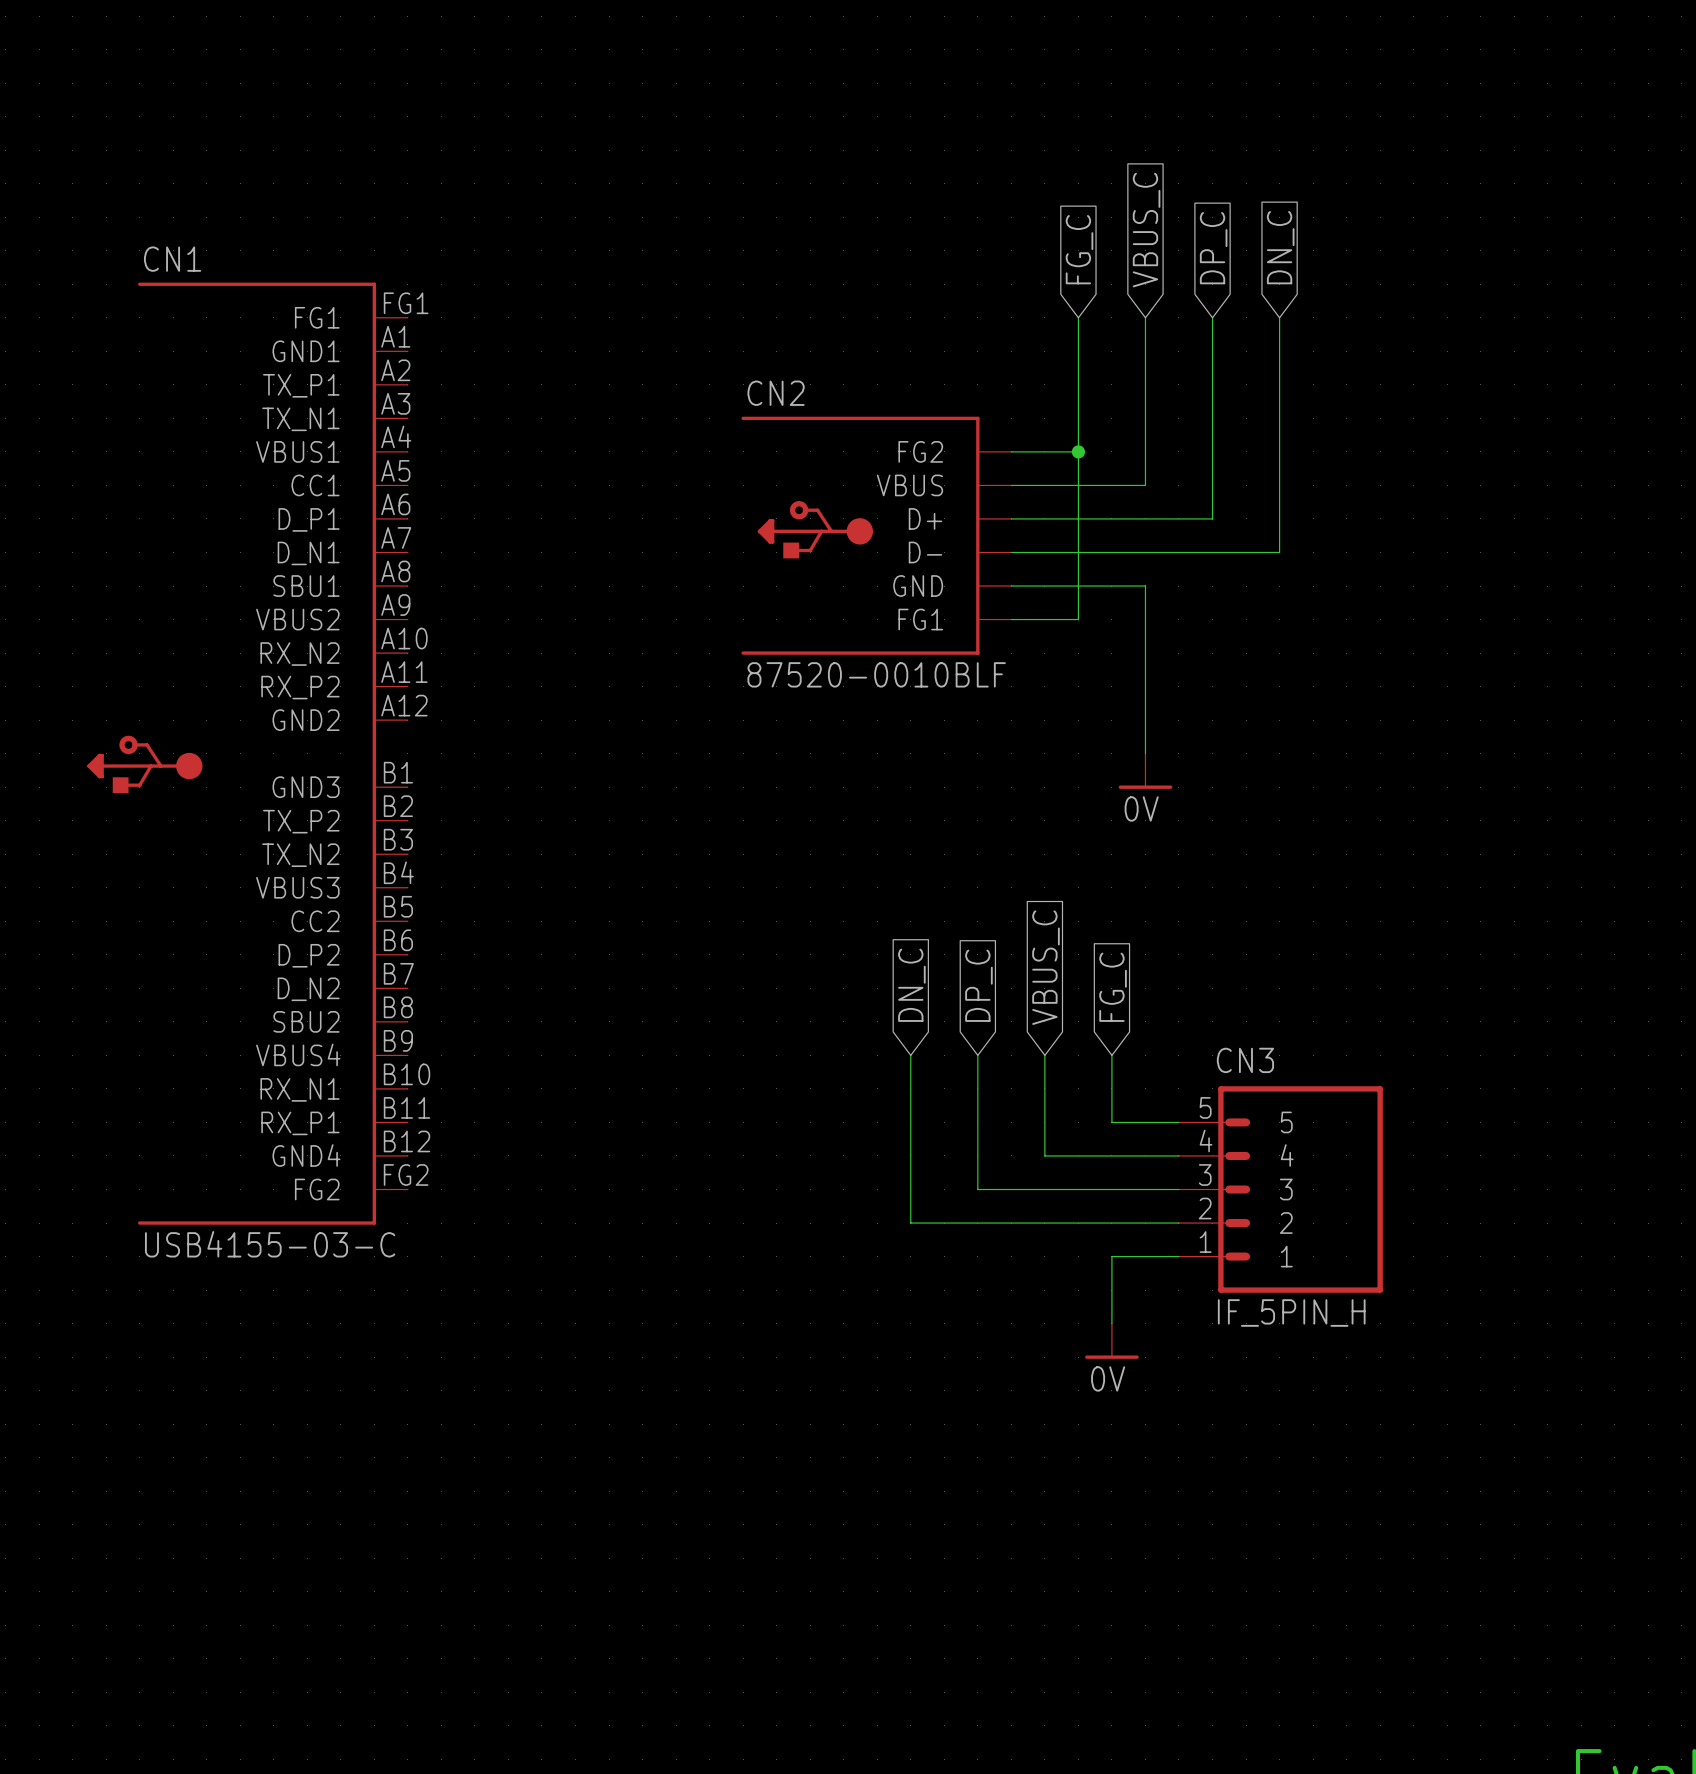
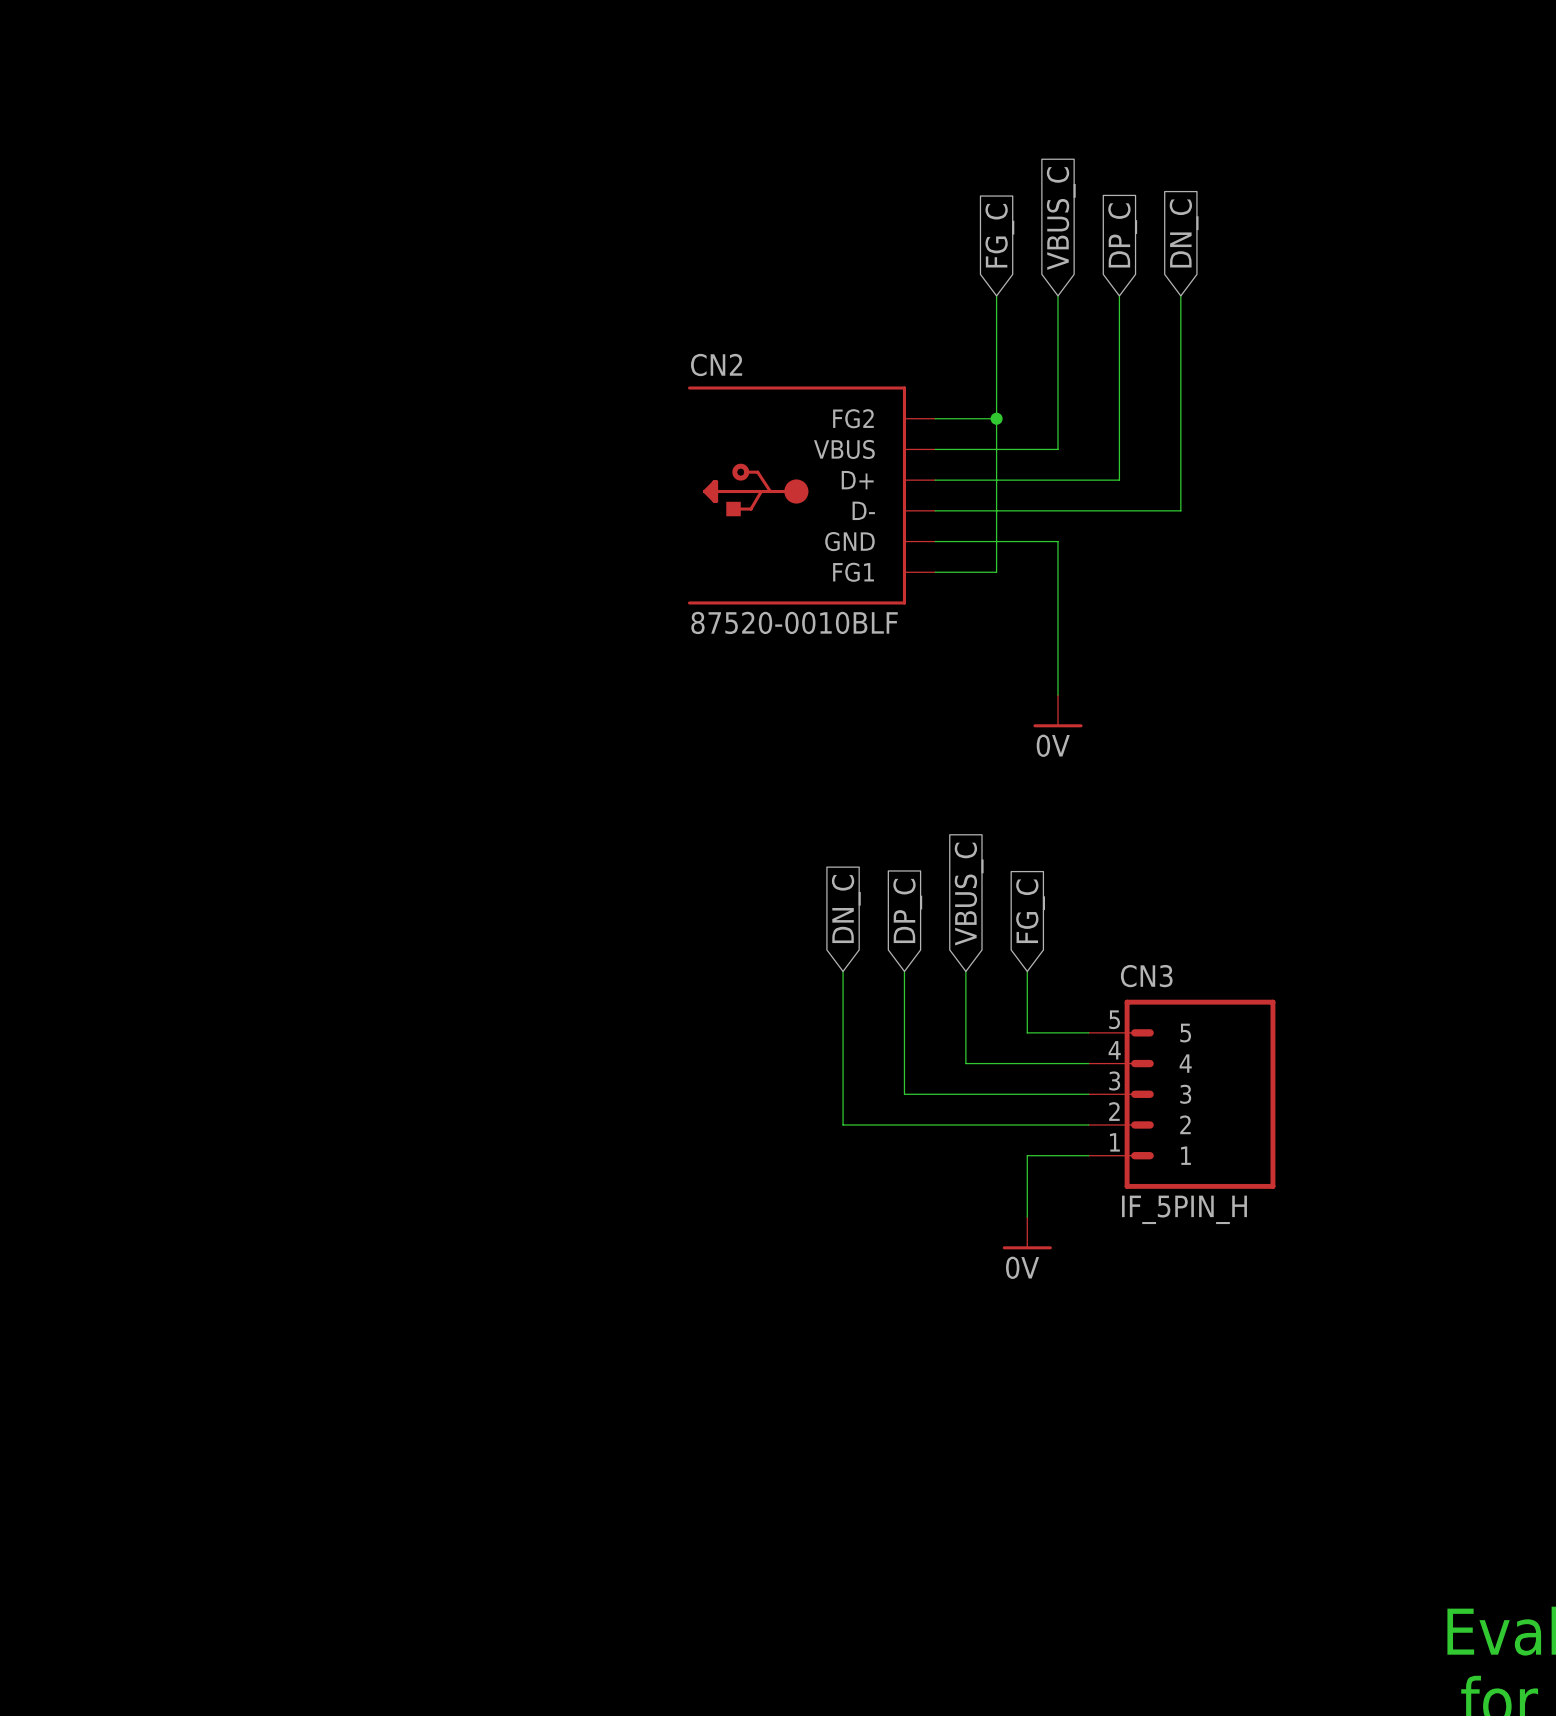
CN1: USB4155-03-C (247, 753) -> none

